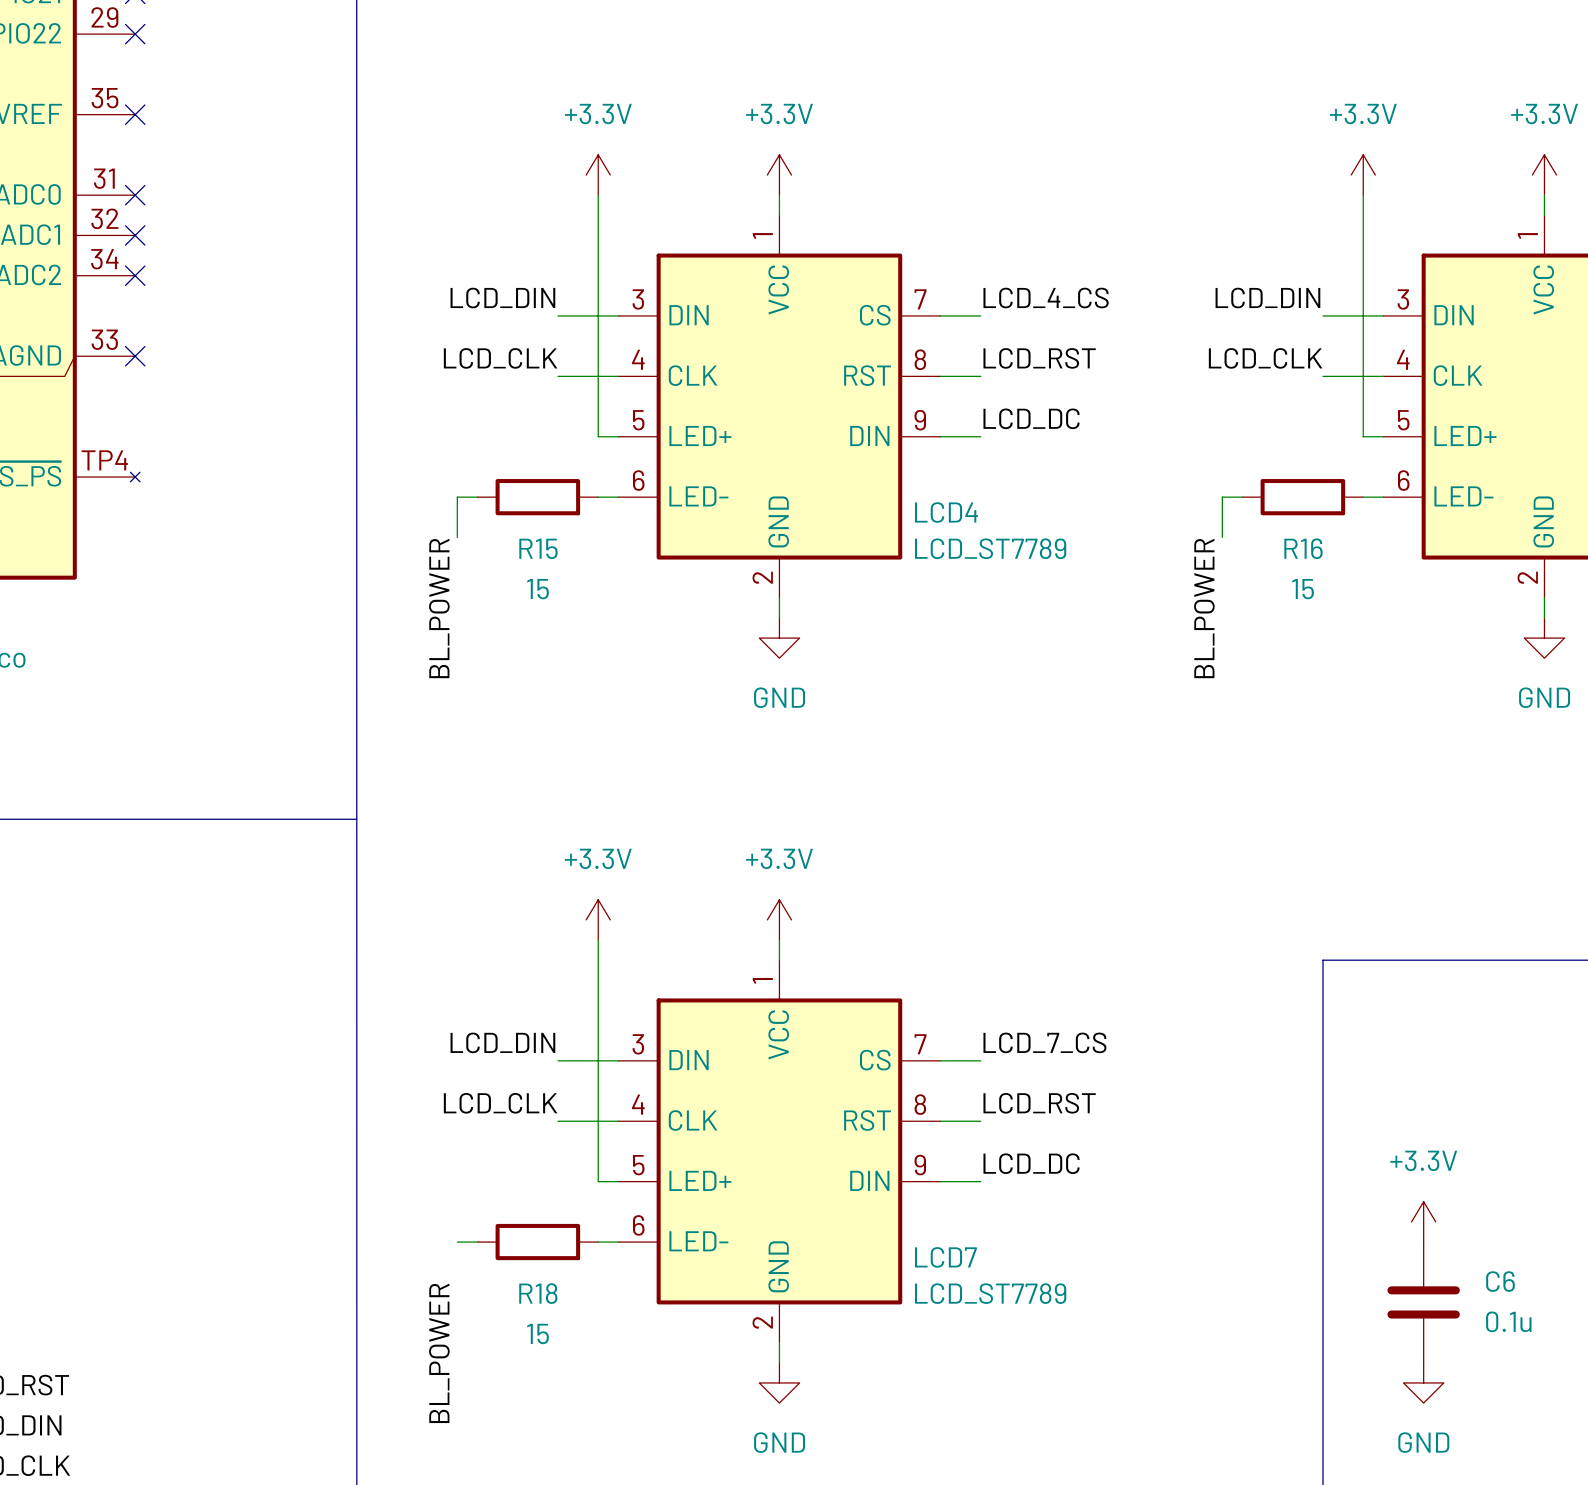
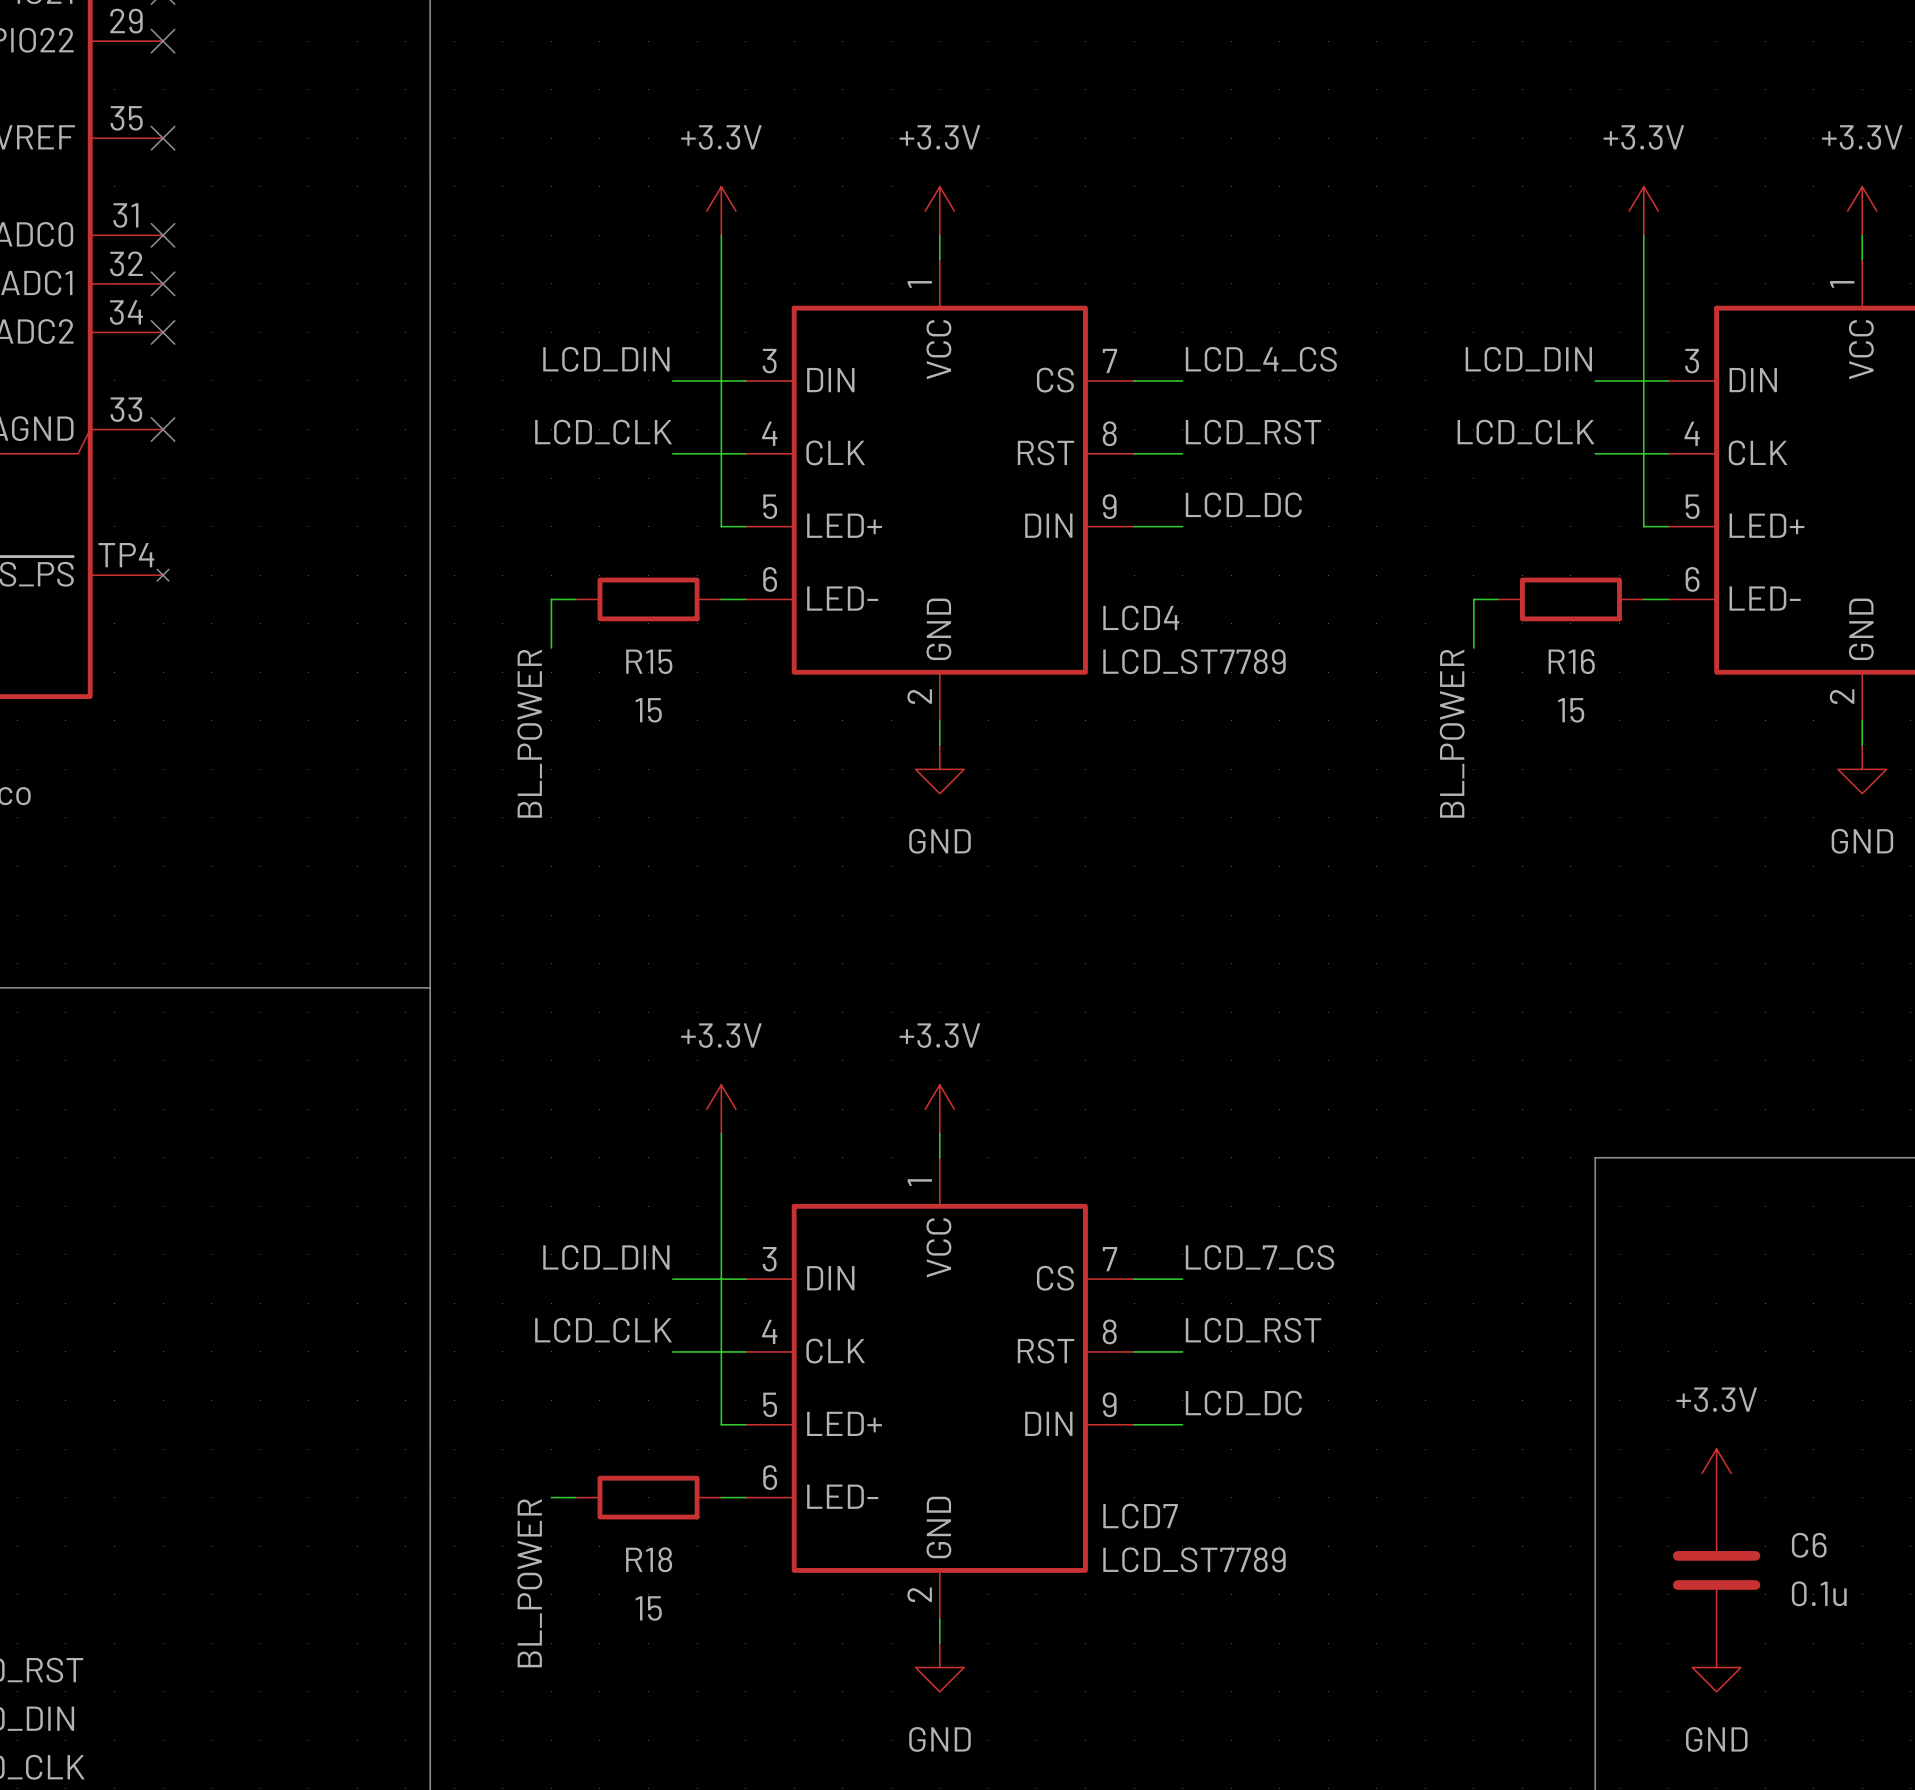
label position: BL_POWER (439, 1353) -> BL_POWER (529, 1583)

